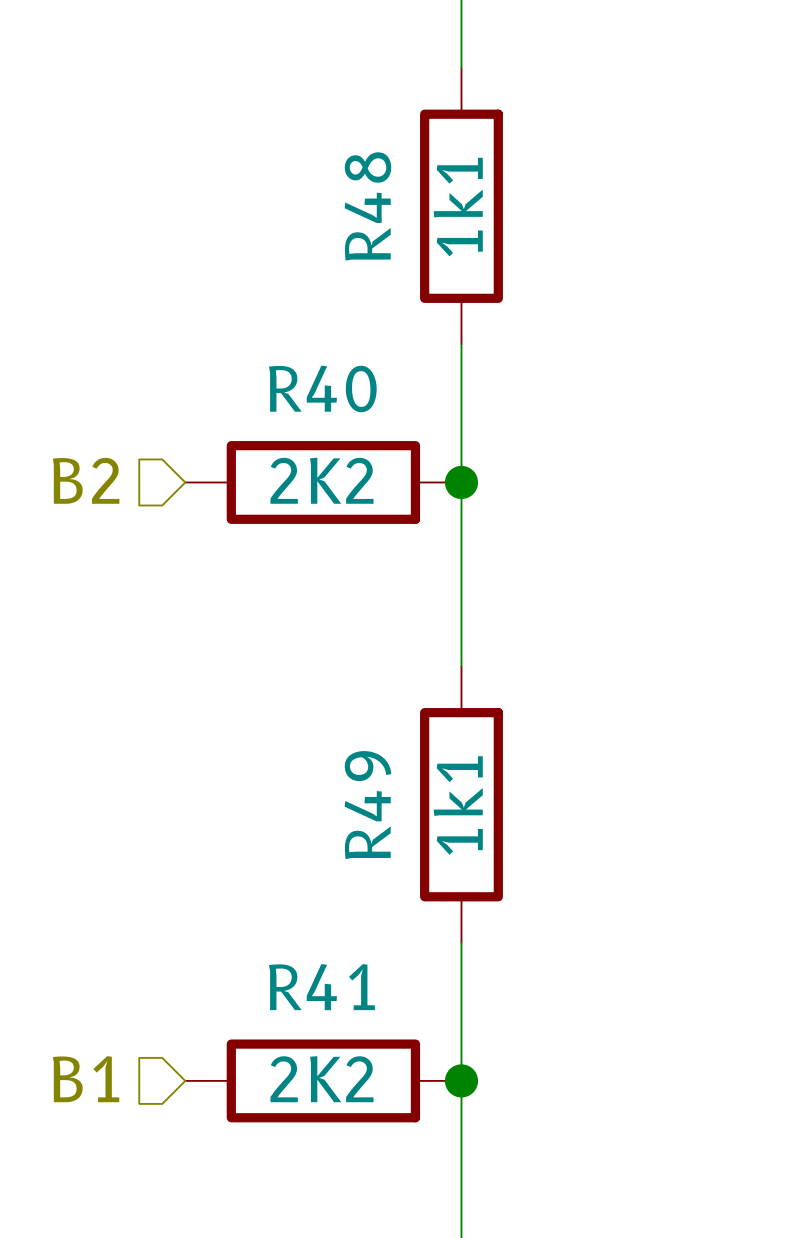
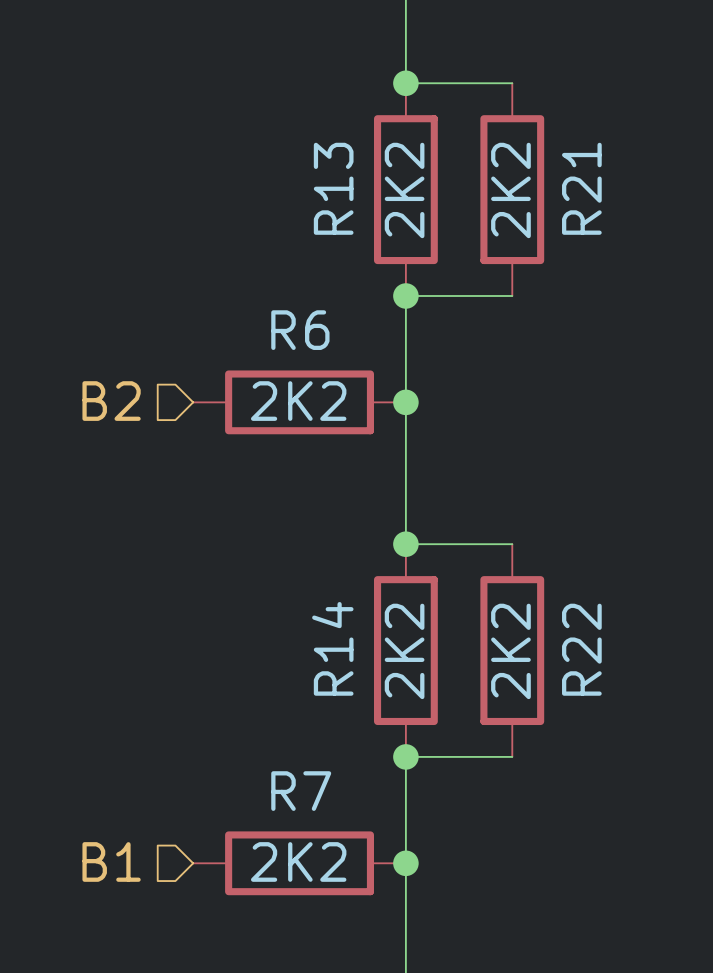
wire: none -> (405, 83) (512, 83)
junction: none -> (405, 83)
R48 name: R48 (367, 206) -> R13 (333, 188)
R21: none -> 2K2 (512, 189)
R48 value: 1k1 (458, 207) -> 2K2 (404, 190)
wire: none -> (405, 295) (512, 295)
junction: none -> (405, 295)
R40 name: R40 (322, 388) -> R6 (300, 330)
wire: none -> (405, 544) (512, 544)
junction: none -> (405, 544)
R22: none -> 2K2 (512, 650)
R49 name: R49 (367, 805) -> R14 (332, 648)
R49 value: 1k1 (458, 805) -> 2K2 (404, 651)
wire: none -> (405, 756) (512, 756)
junction: none -> (405, 756)
R41 name: R41 (321, 987) -> R7 (301, 791)

